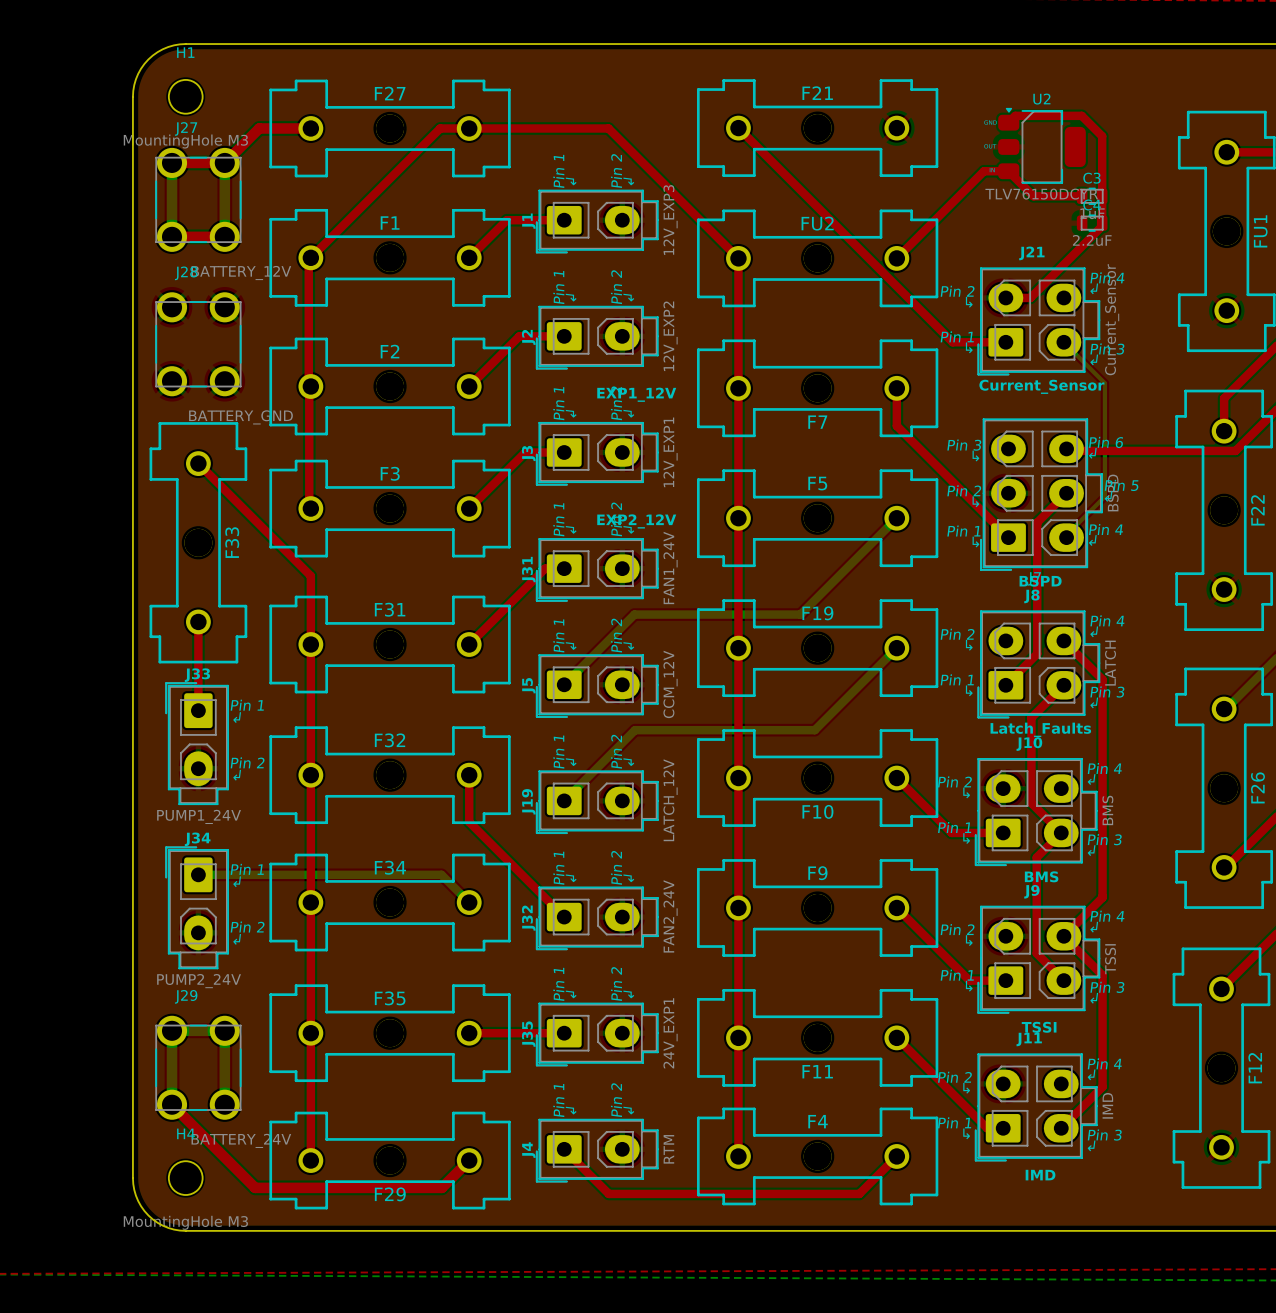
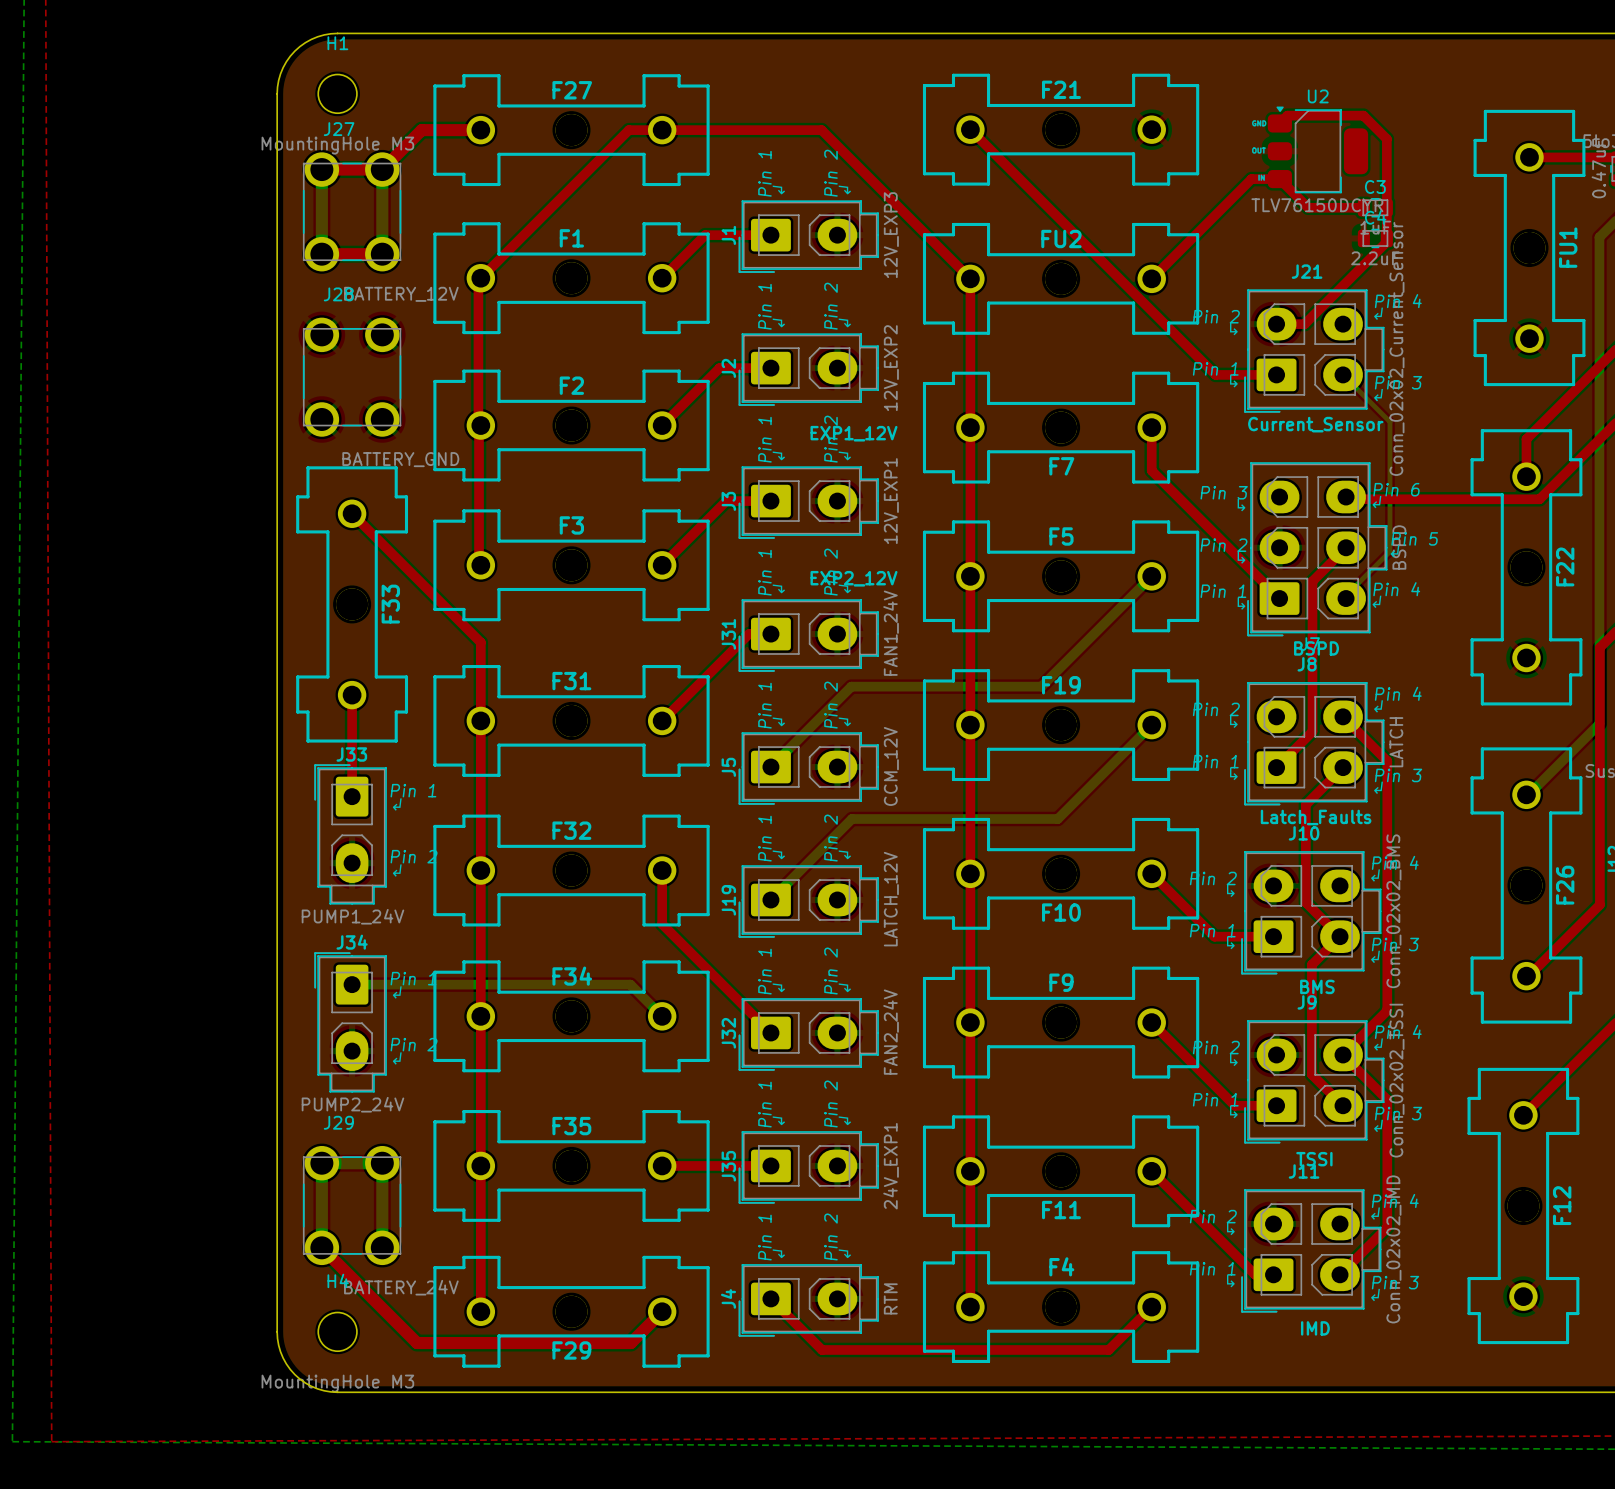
J21 value: Current_Sensor (1112, 319) -> Conn_02x02_Current_Sensor (1396, 348)
J10 value: BMS (1107, 810) -> Conn_02x02_BMS (1393, 911)
J9 value: TSSI (1110, 959) -> Conn_02x02_TSSI (1396, 1080)
J11 value: IMD (1107, 1105) -> Conn_02x02_IMD (1393, 1249)

